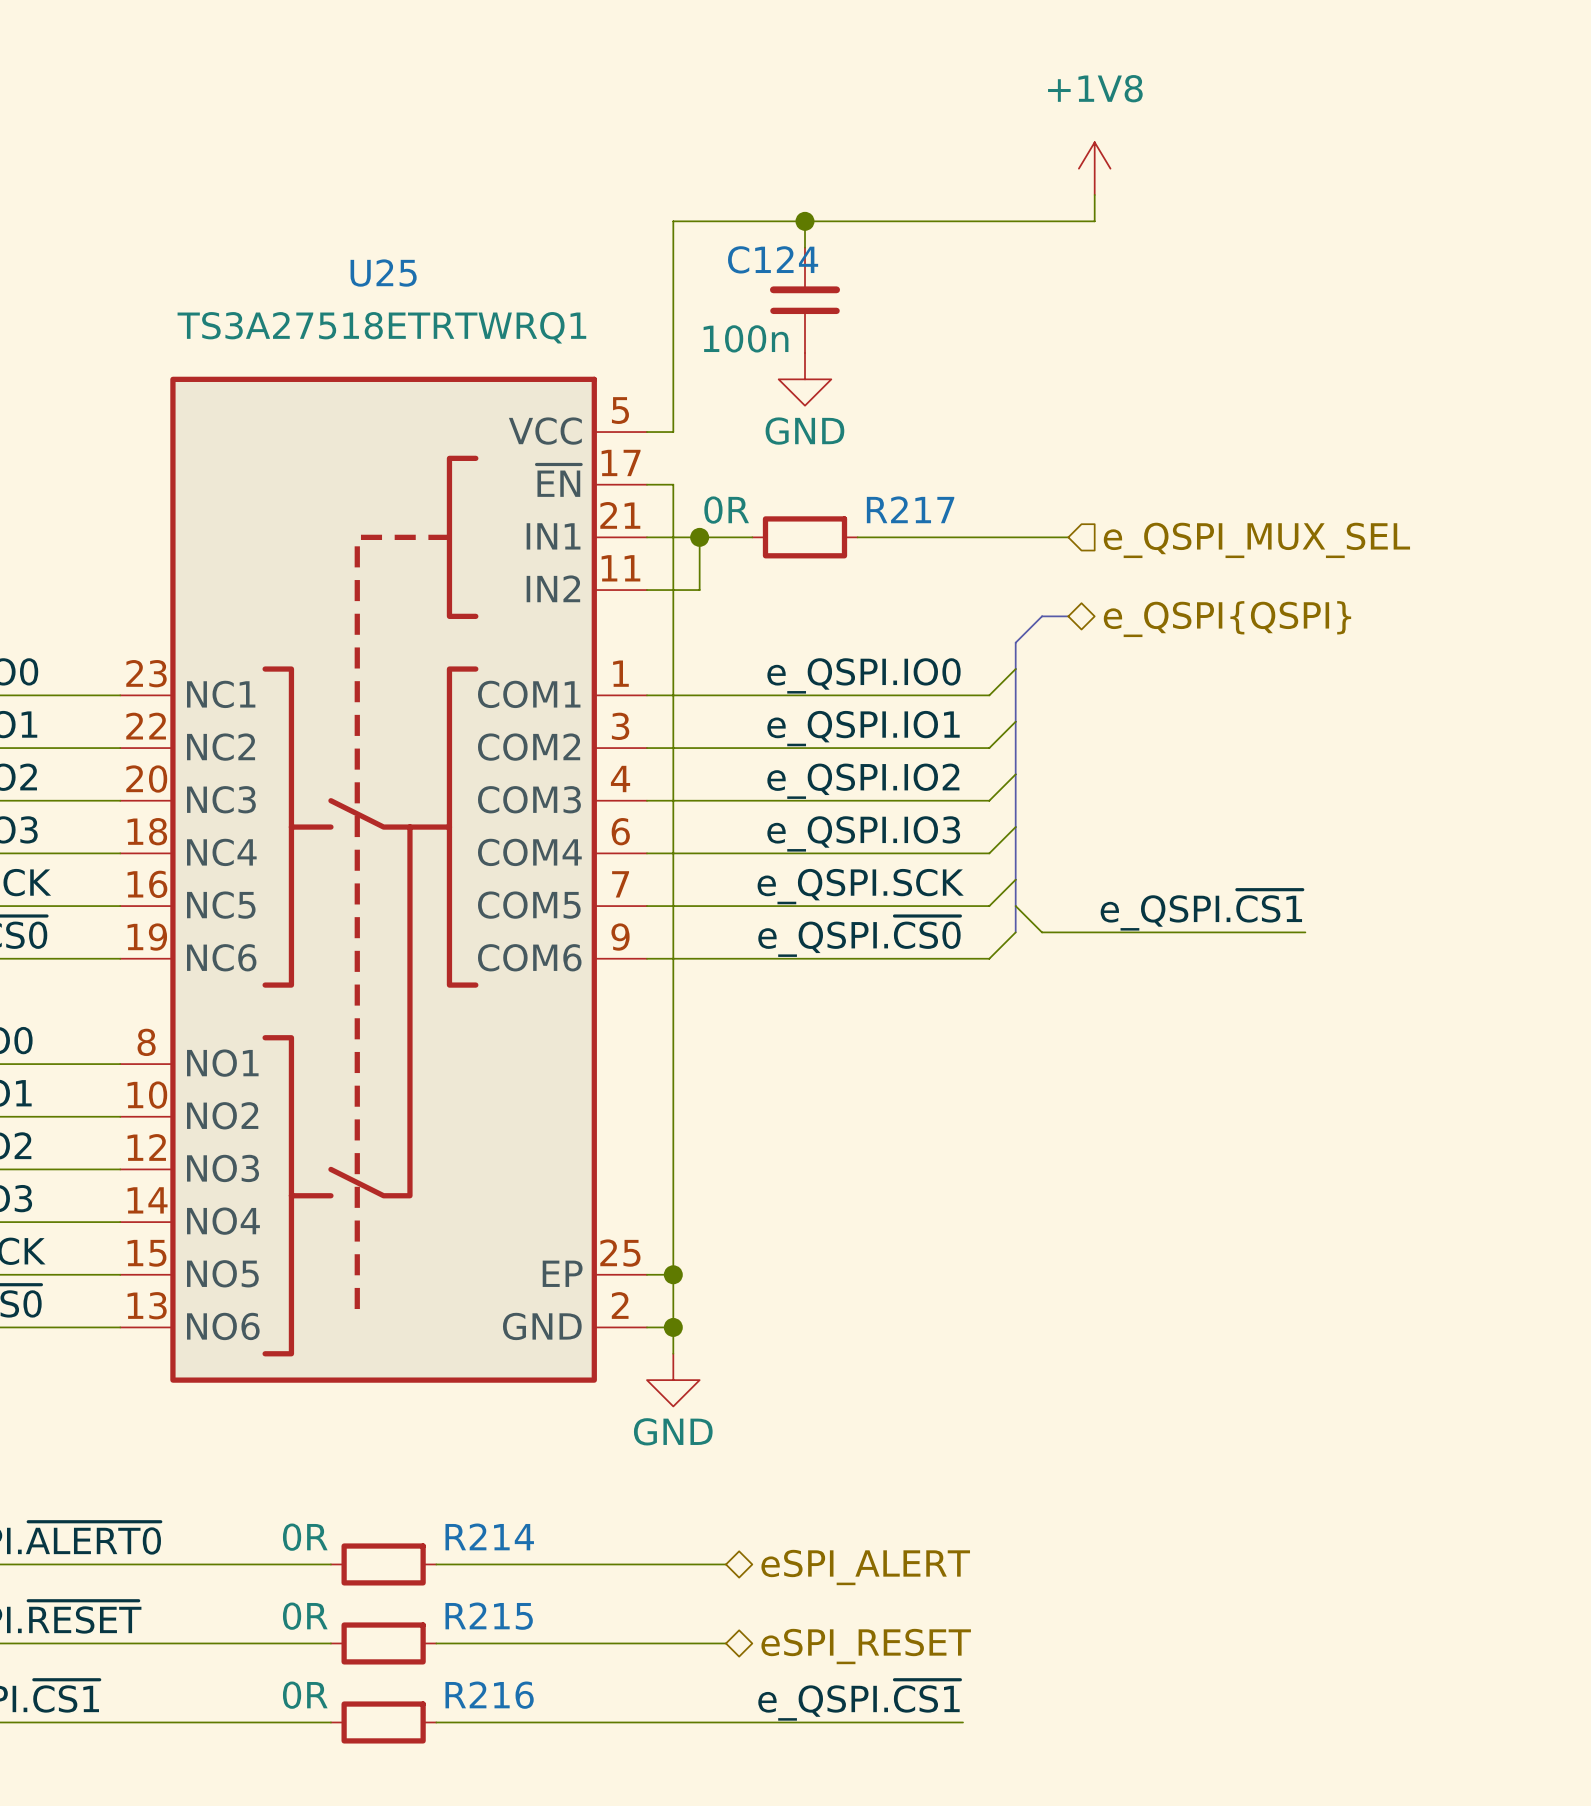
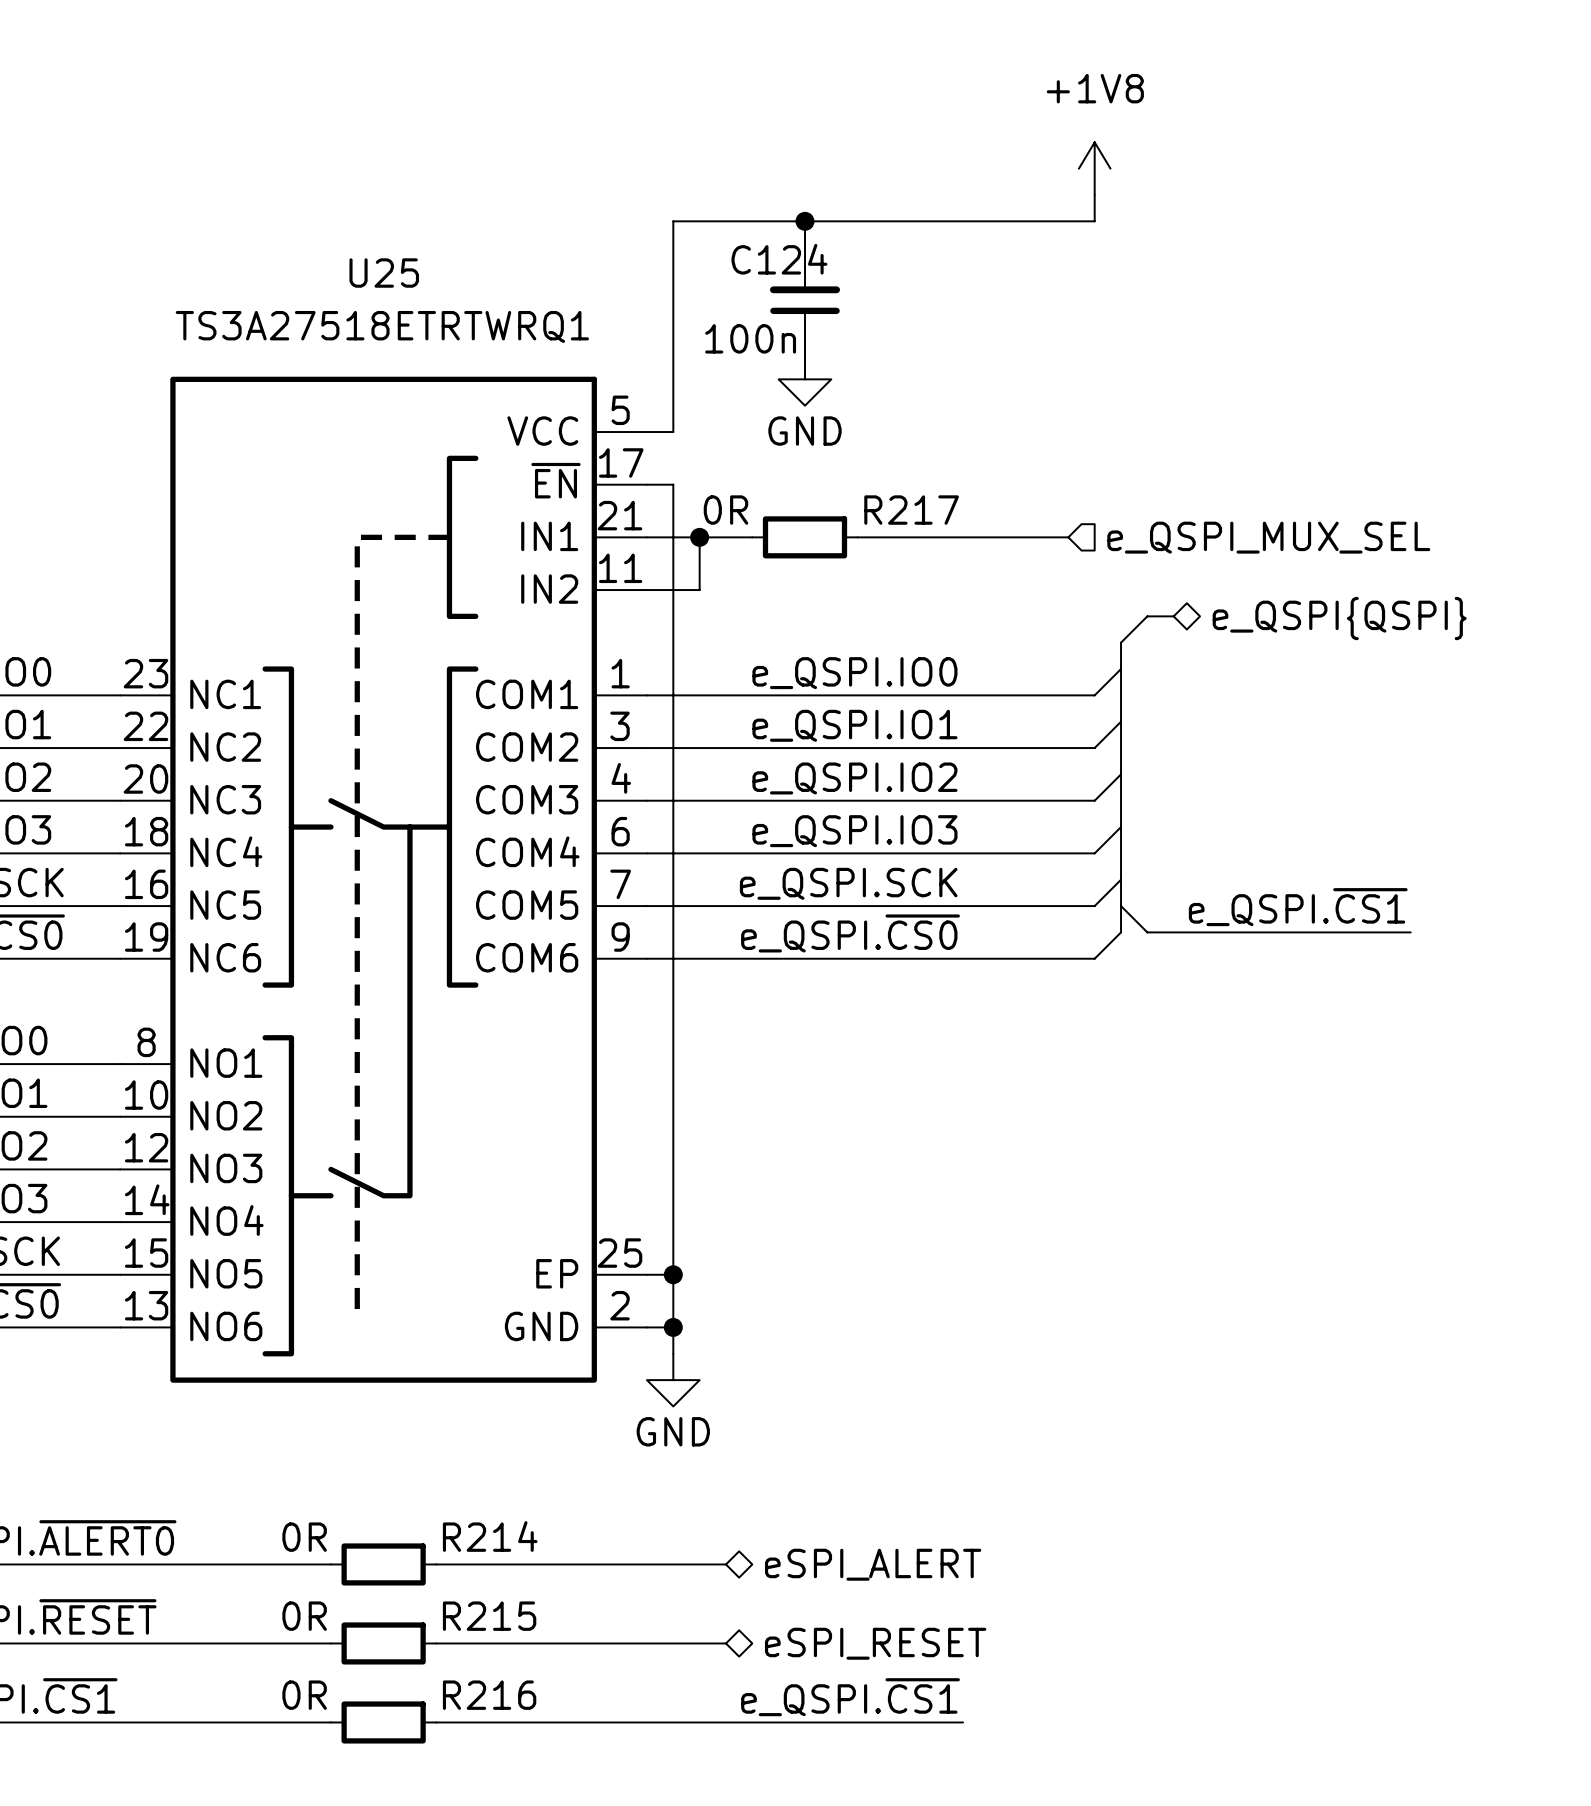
bus: (1068, 616) (1042, 616) (1015, 642) (1015, 932) -> (1173, 616) (1147, 616) (1121, 642) (1121, 932)
hierarchical label position: e_QSPI{QSPI} (1227, 619) -> e_QSPI{QSPI} (1339, 618)
wire: (1015, 669) (989, 695) -> (1121, 669) (1094, 695) (989, 695)
wire: (1015, 721) (989, 748) -> (1121, 721) (1094, 748) (989, 748)
wire: (1015, 774) (989, 800) -> (1121, 774) (1094, 800) (989, 800)
wire: (1015, 827) (989, 853) -> (1121, 827) (1094, 853) (989, 853)
wire: (1015, 879) (989, 906) -> (1121, 879) (1094, 906) (989, 906)
wire: (1015, 906) (1042, 932) (1147, 932) -> (1121, 906) (1147, 932)
label position: e_QSPI.~{CS1} (1201, 910) -> e_QSPI.~{CS1} (1298, 907)
wire: (1015, 932) (989, 958) -> (1121, 932) (1094, 958) (989, 958)
wire: none -> (1305, 932) (1410, 932)

